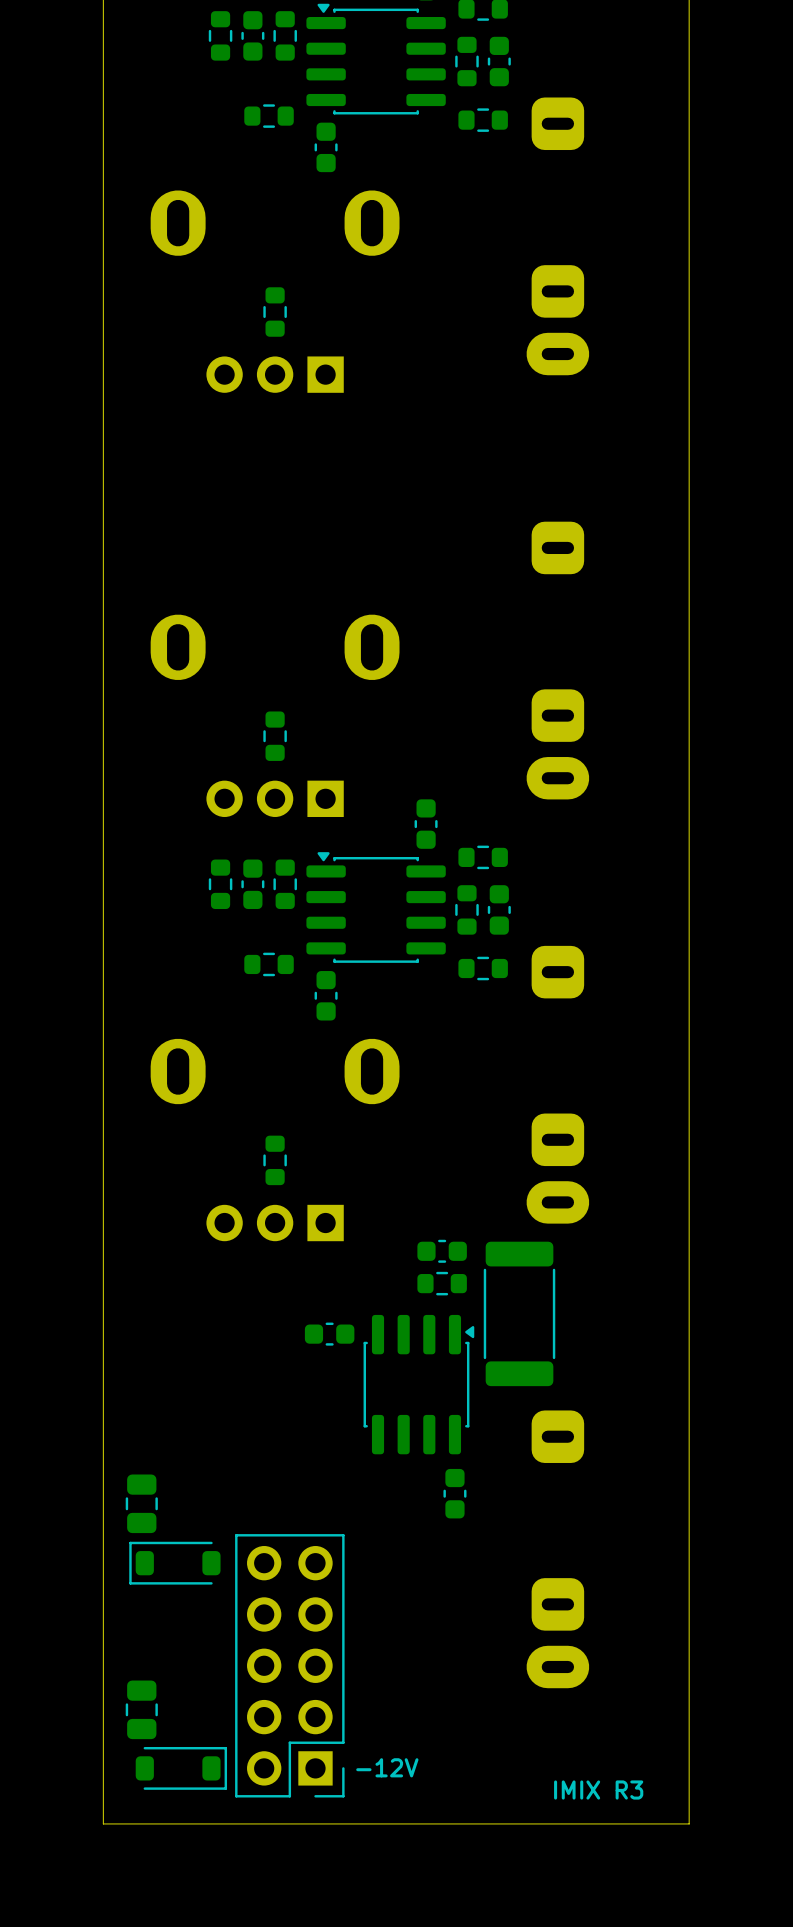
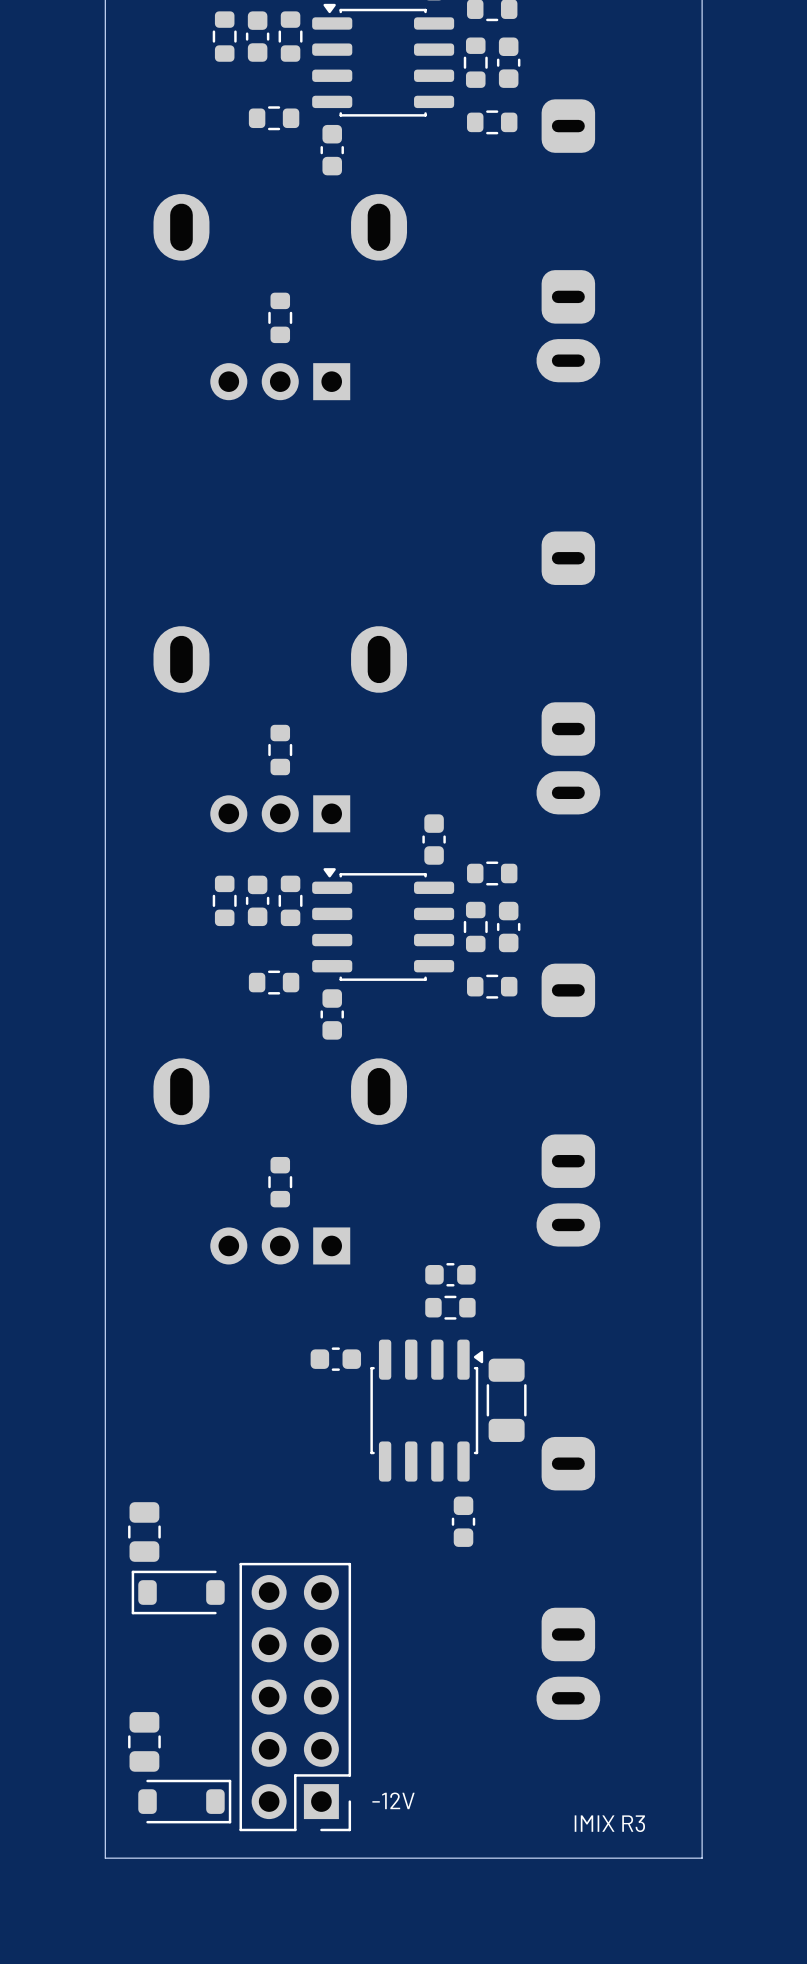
part: (519, 1313) -> none
part: none -> (506, 1400)

